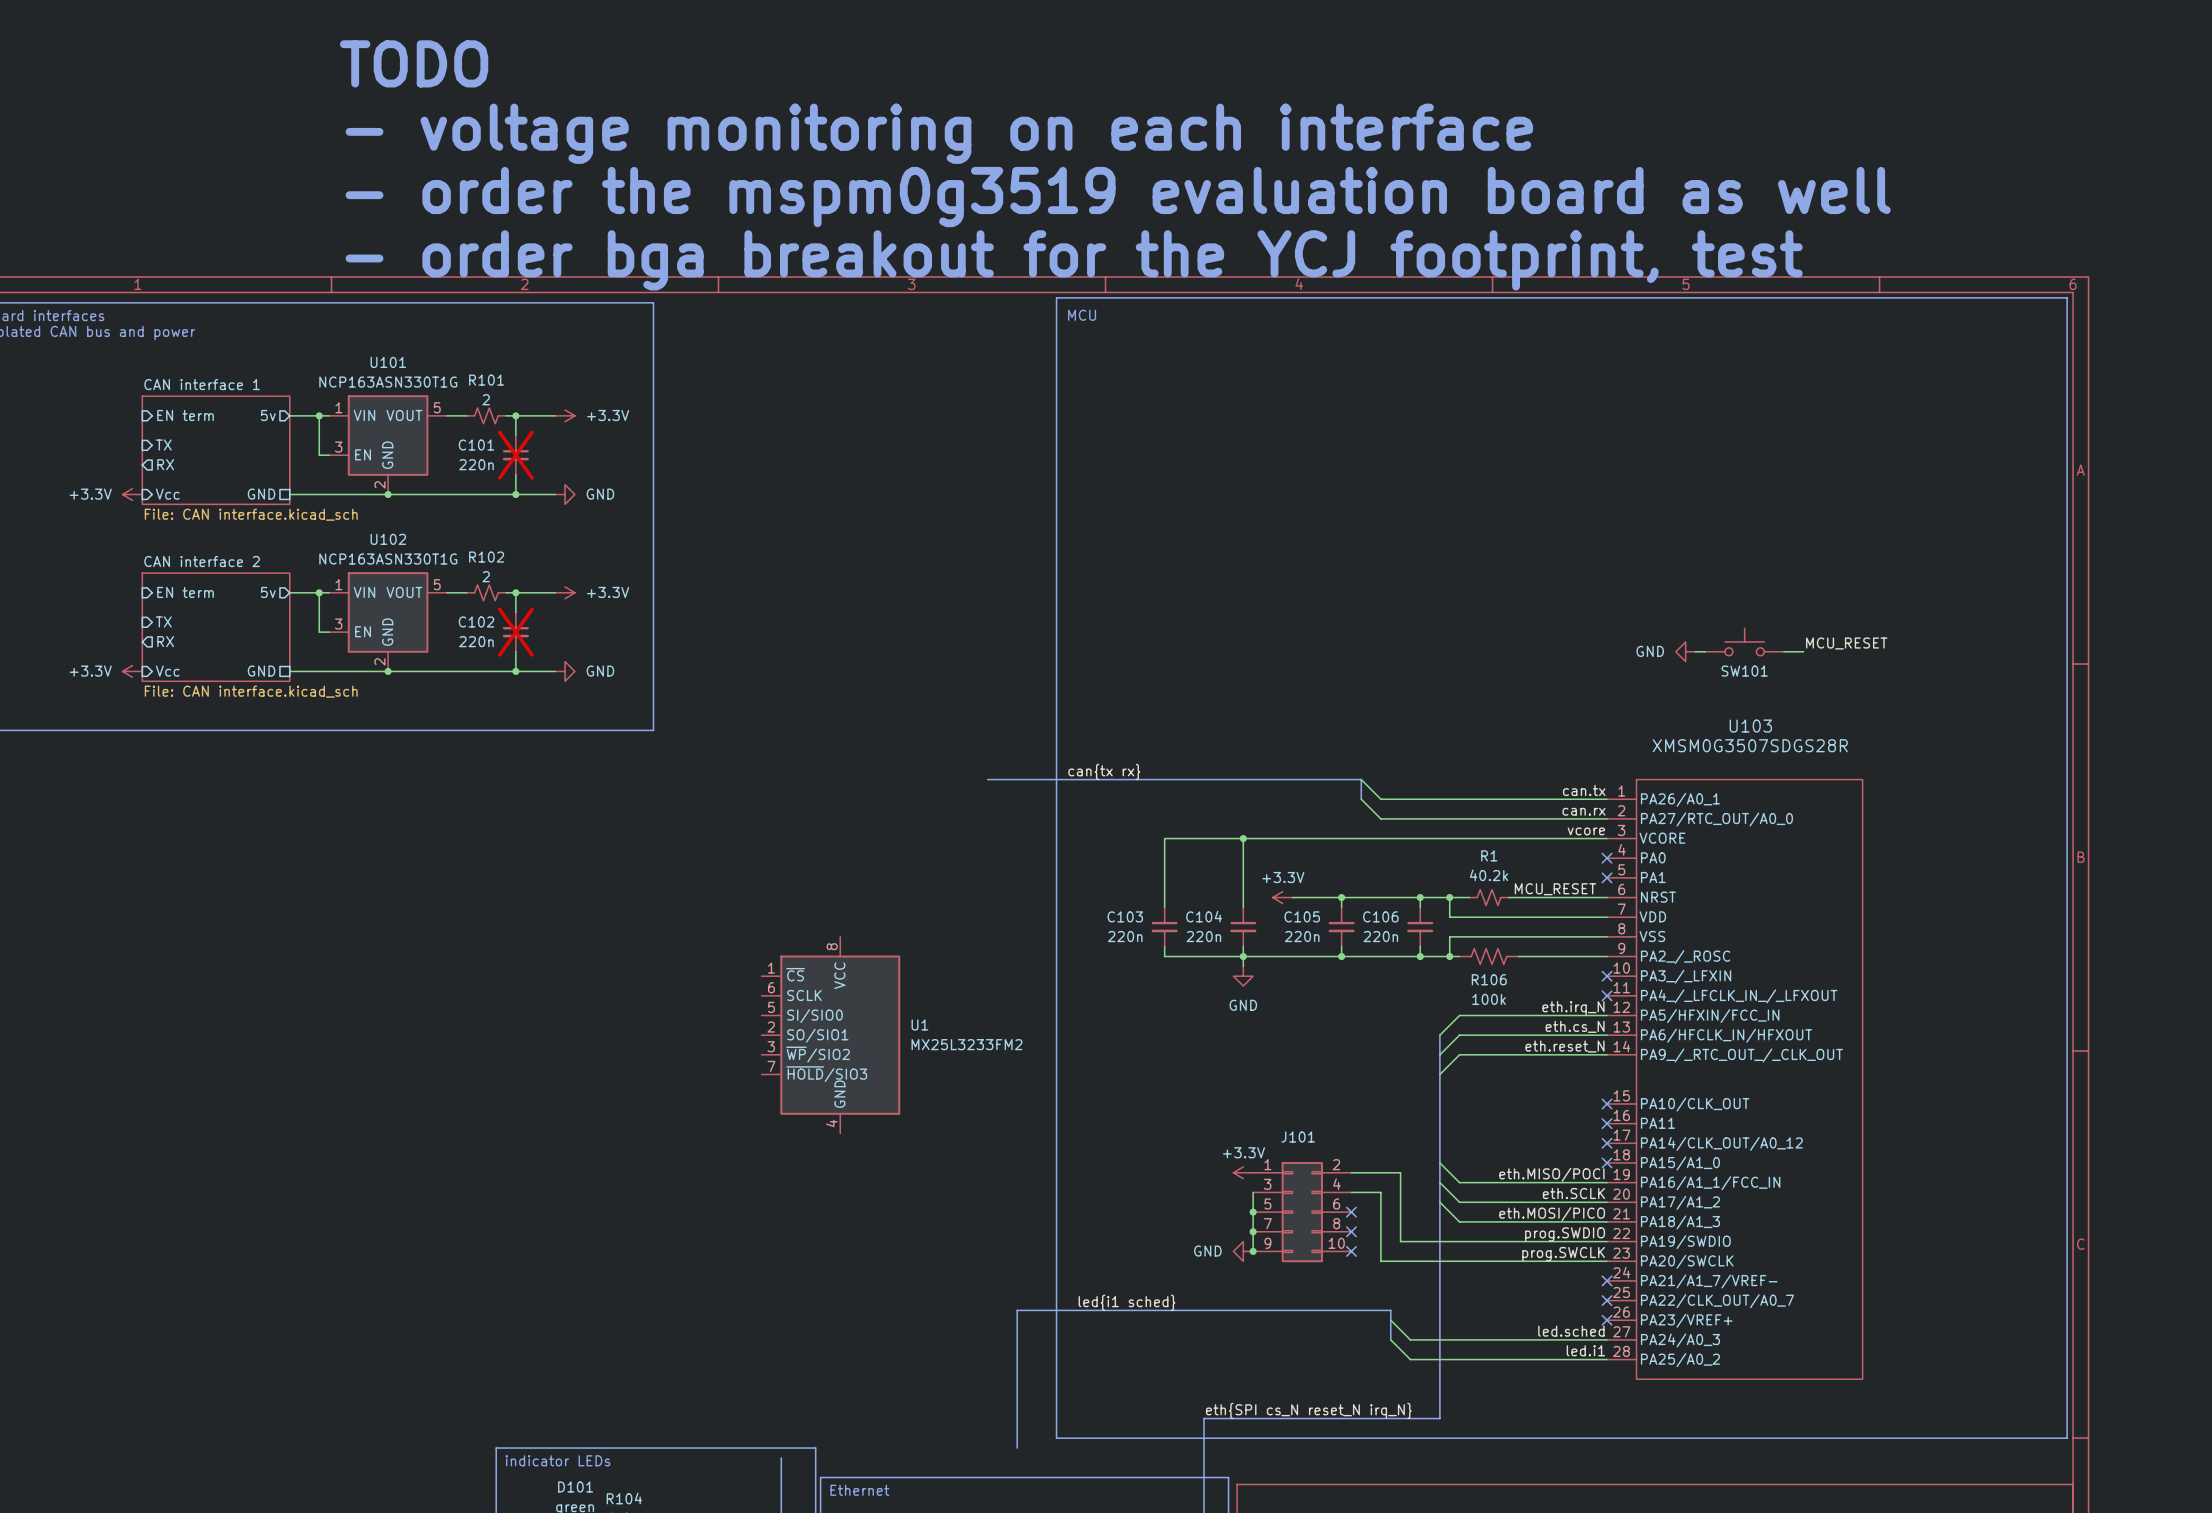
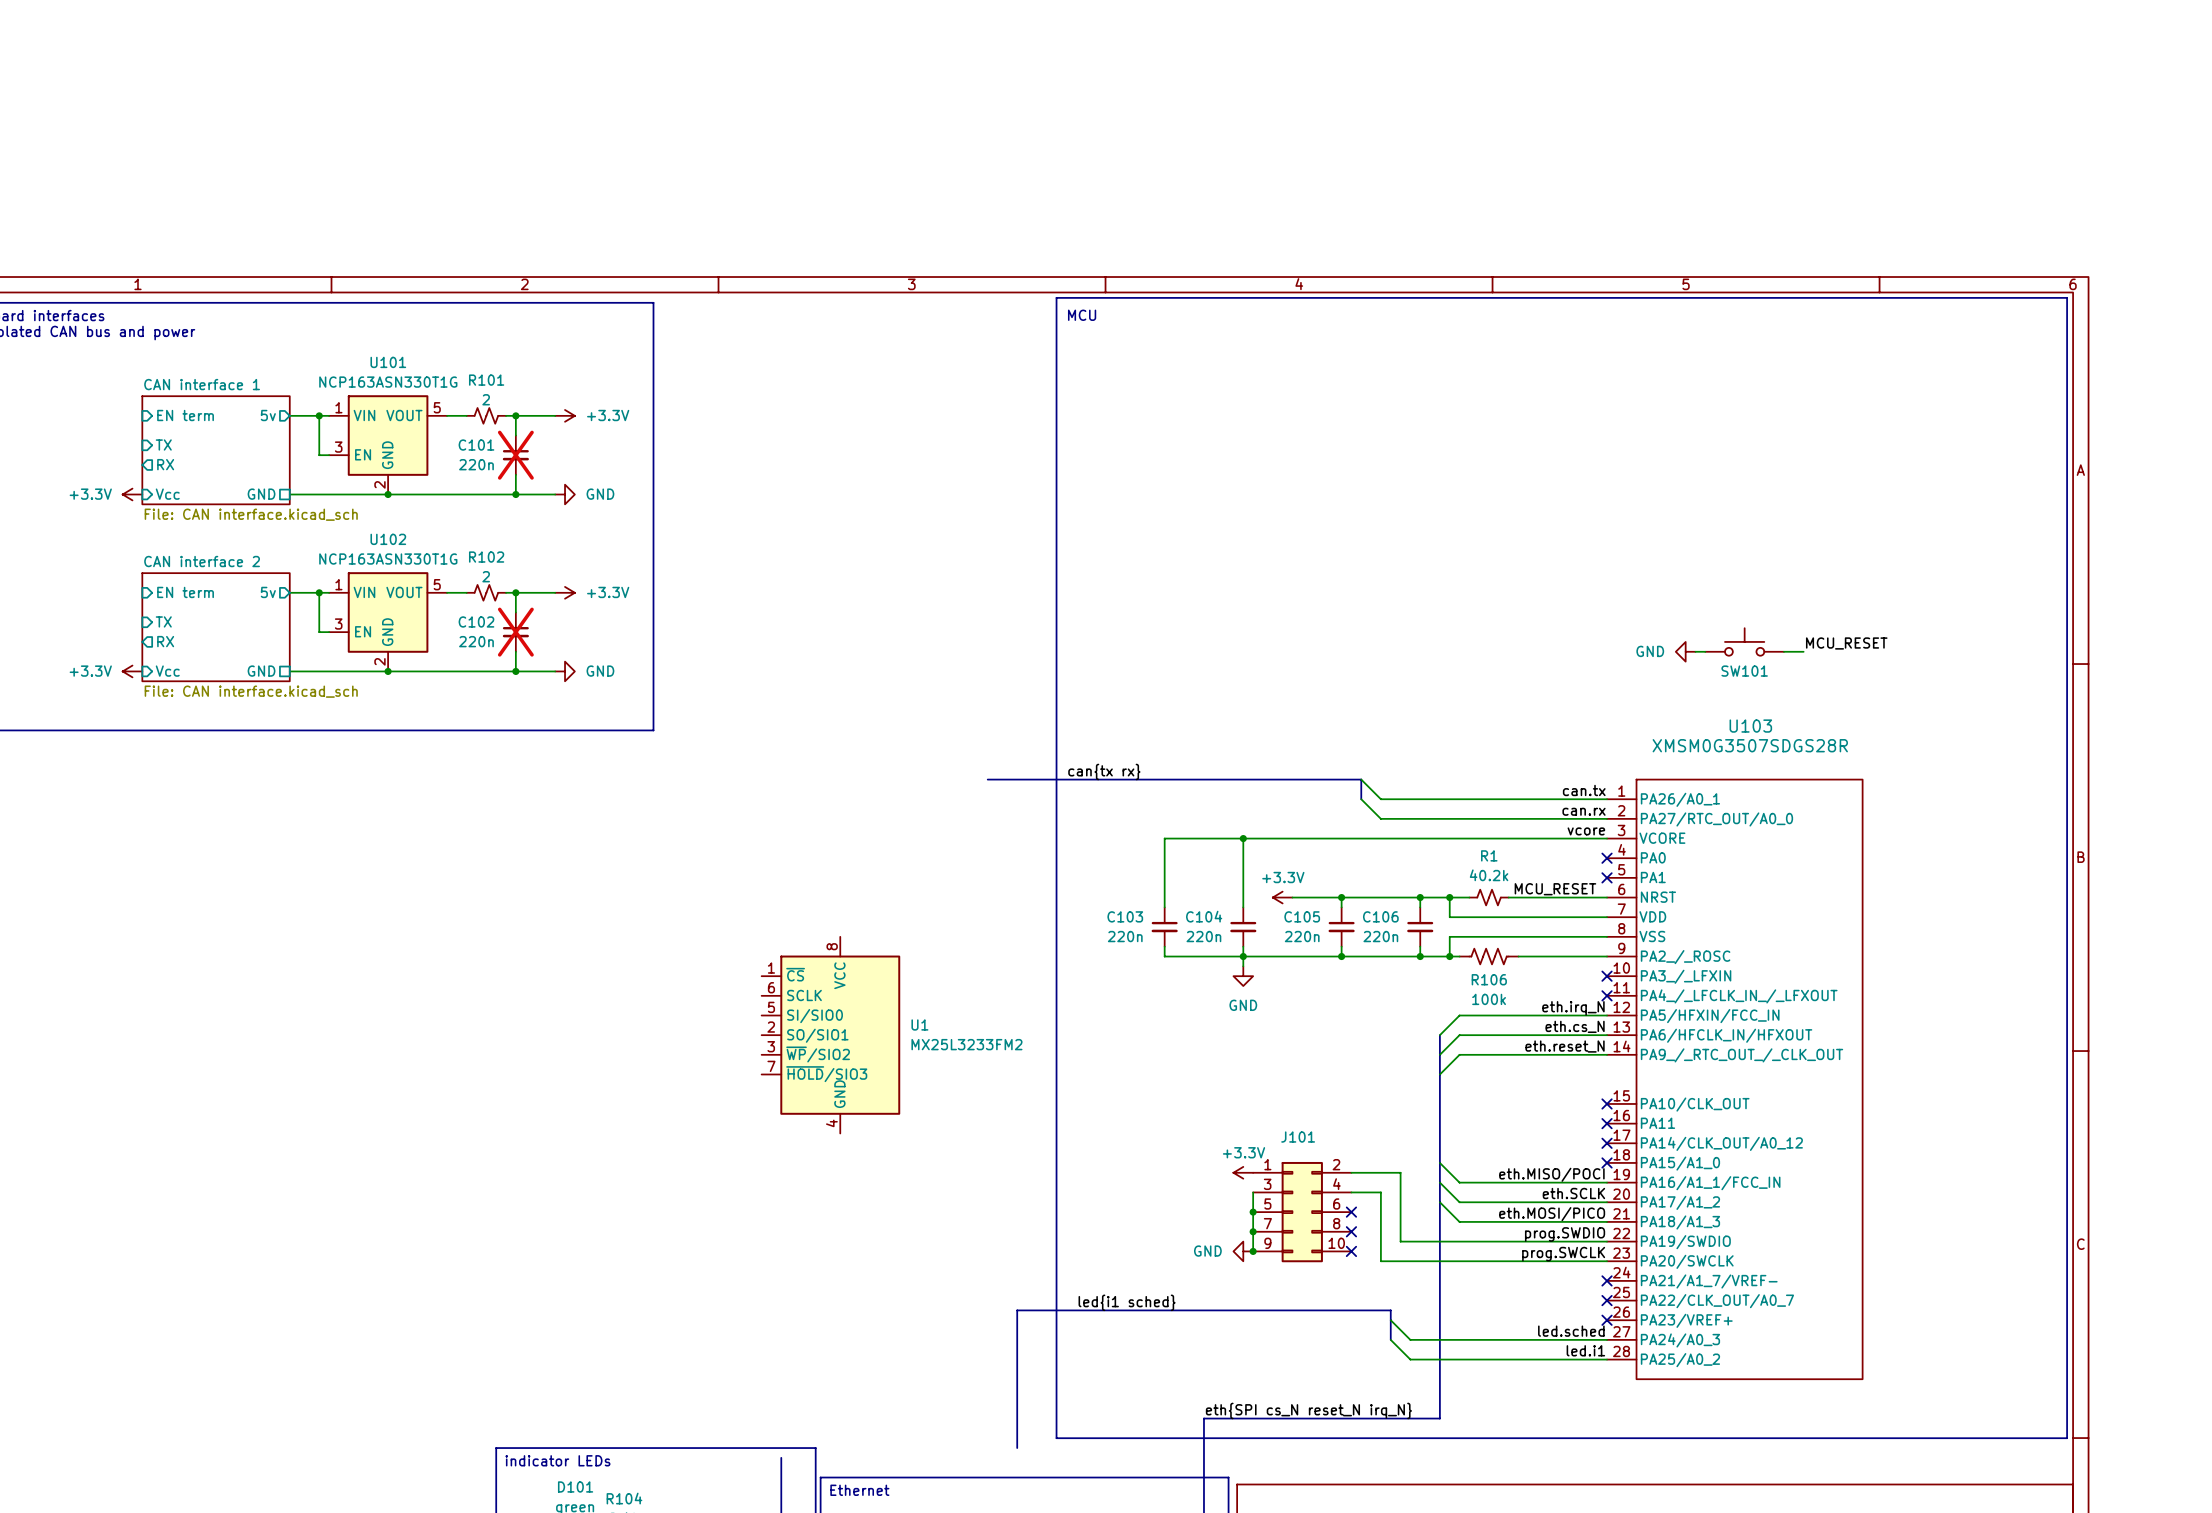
text: TODO (414, 63) -> none
text: - voltage monitoring on each interface (939, 133) -> none
text: - order the mspm0g3519 evaluation board as well (1118, 197) -> none
text: - order bga breakout for the YCJ footprint, test (1074, 260) -> none

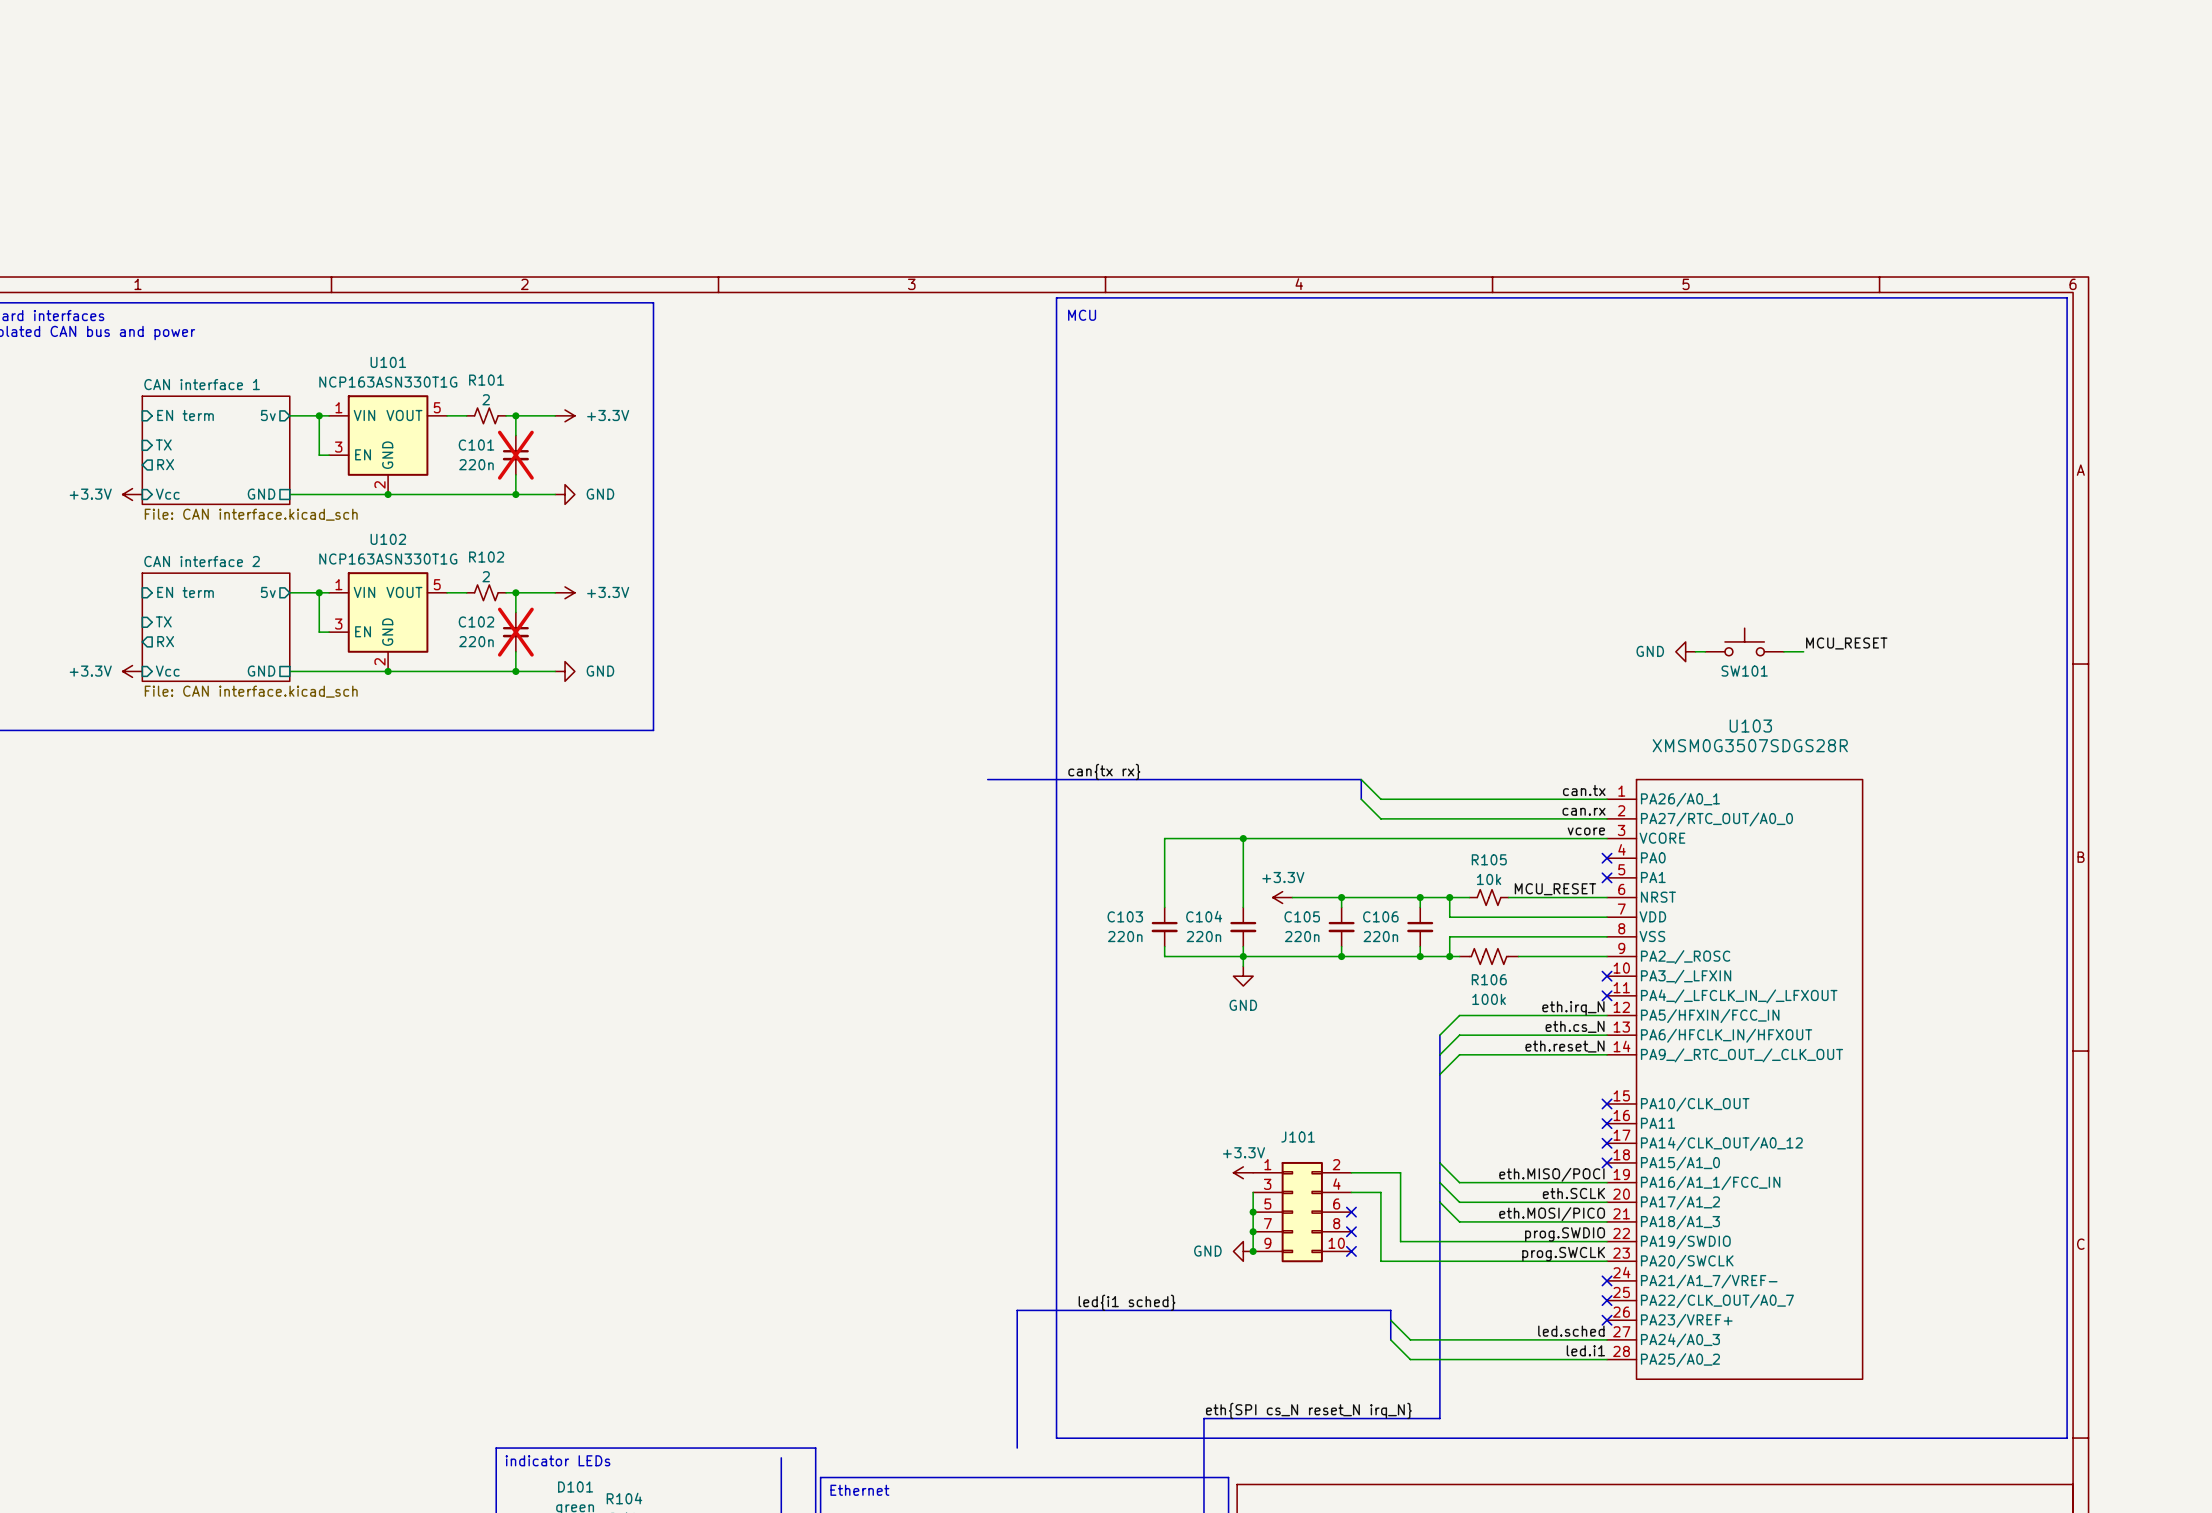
R1 name: R1 (1489, 855) -> R105 (1489, 859)
R1 value: 40.2k (1489, 875) -> 10k (1489, 879)
U1: MX25L3233FM2 (830, 1035) -> none

